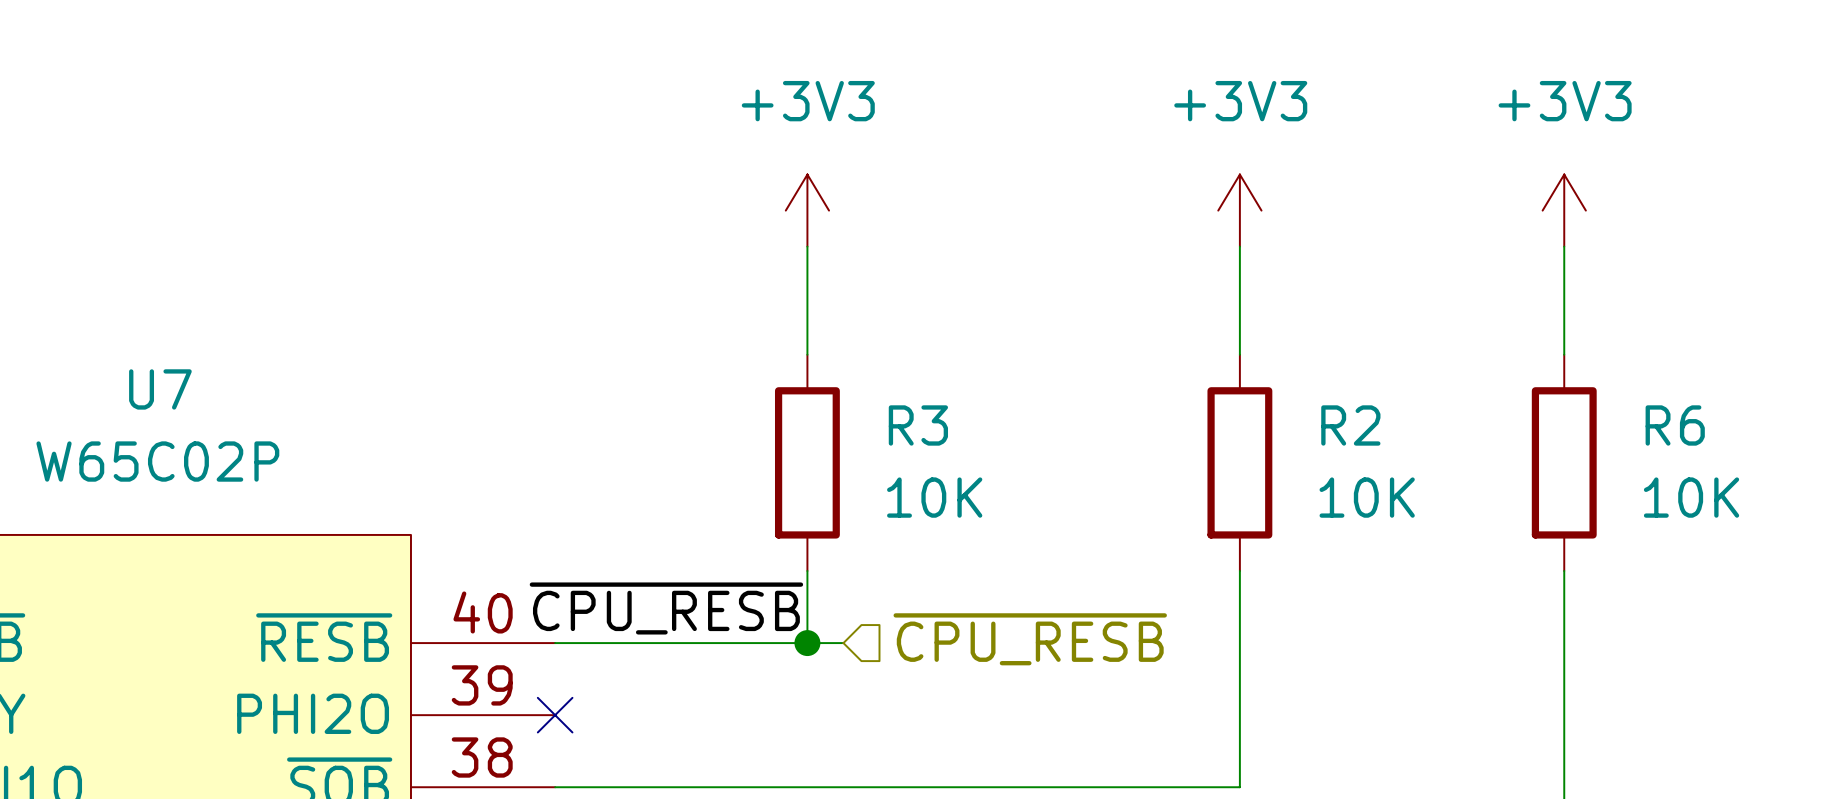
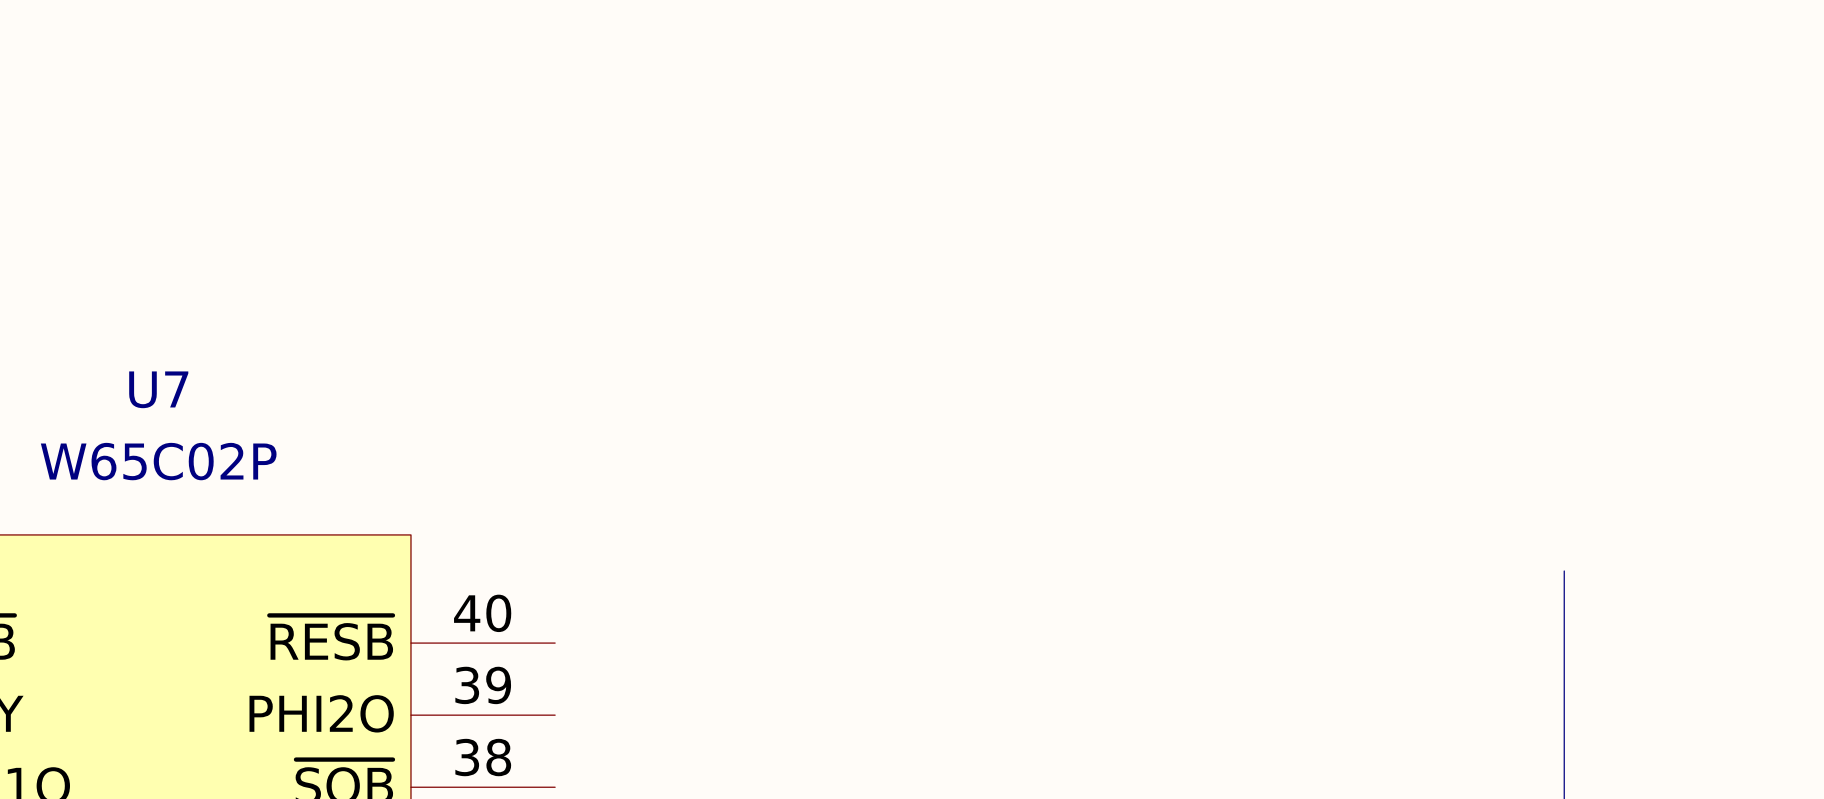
power symbol: +3V3 (807, 210) -> none
power symbol: +3V3 (1239, 210) -> none
power symbol: +3V3 (1564, 210) -> none
wire: (807, 246) (807, 354) -> none
wire: (1239, 246) (1239, 354) -> none
wire: (1564, 246) (1564, 354) -> none
R3: 10K (807, 462) -> none
R2: 10K (1239, 462) -> none
R6: 10K (1564, 462) -> none
wire: (807, 570) (807, 643) -> none
wire: (1239, 570) (1239, 787) (555, 787) -> none
label: ~{CPU_RESB} (666, 608) -> none
hierarchical label: ~{CPU_RESB} (1030, 639) -> none
wire: (555, 643) (843, 643) -> none
junction: (807, 643) -> none
no-connect mark: (555, 715) -> none

